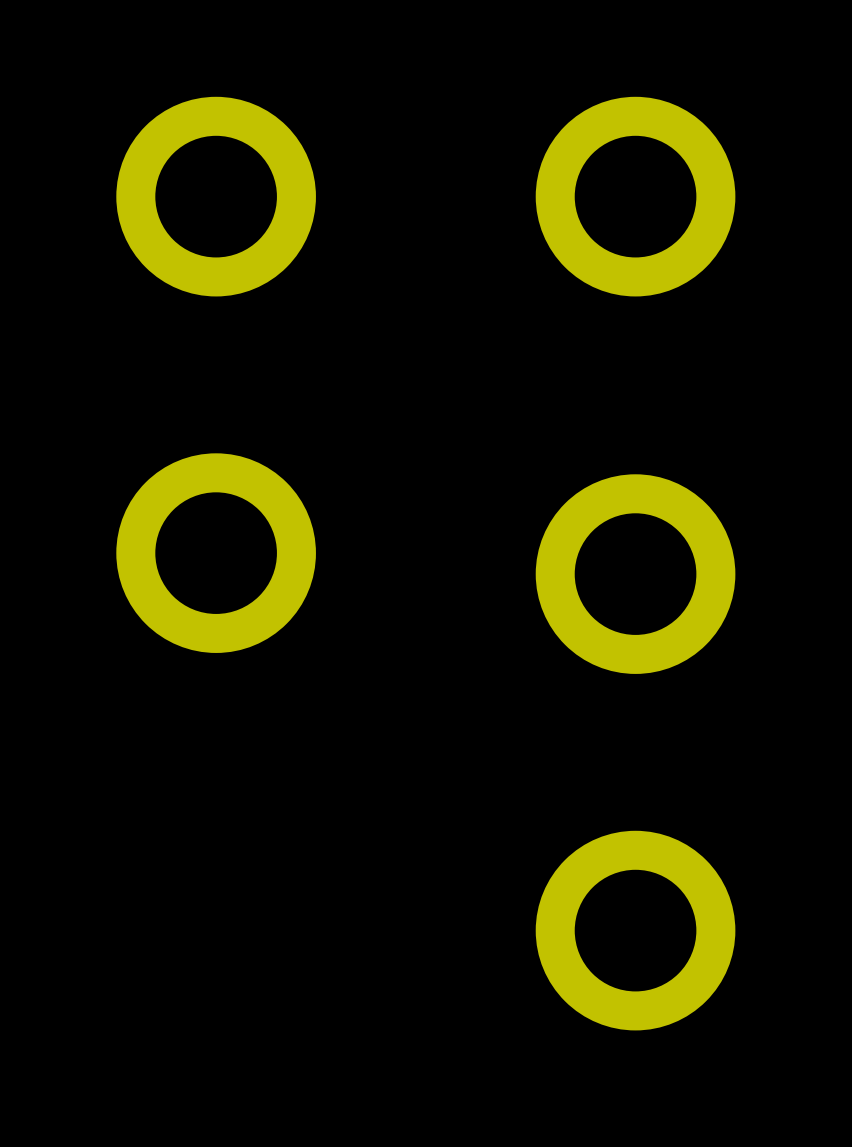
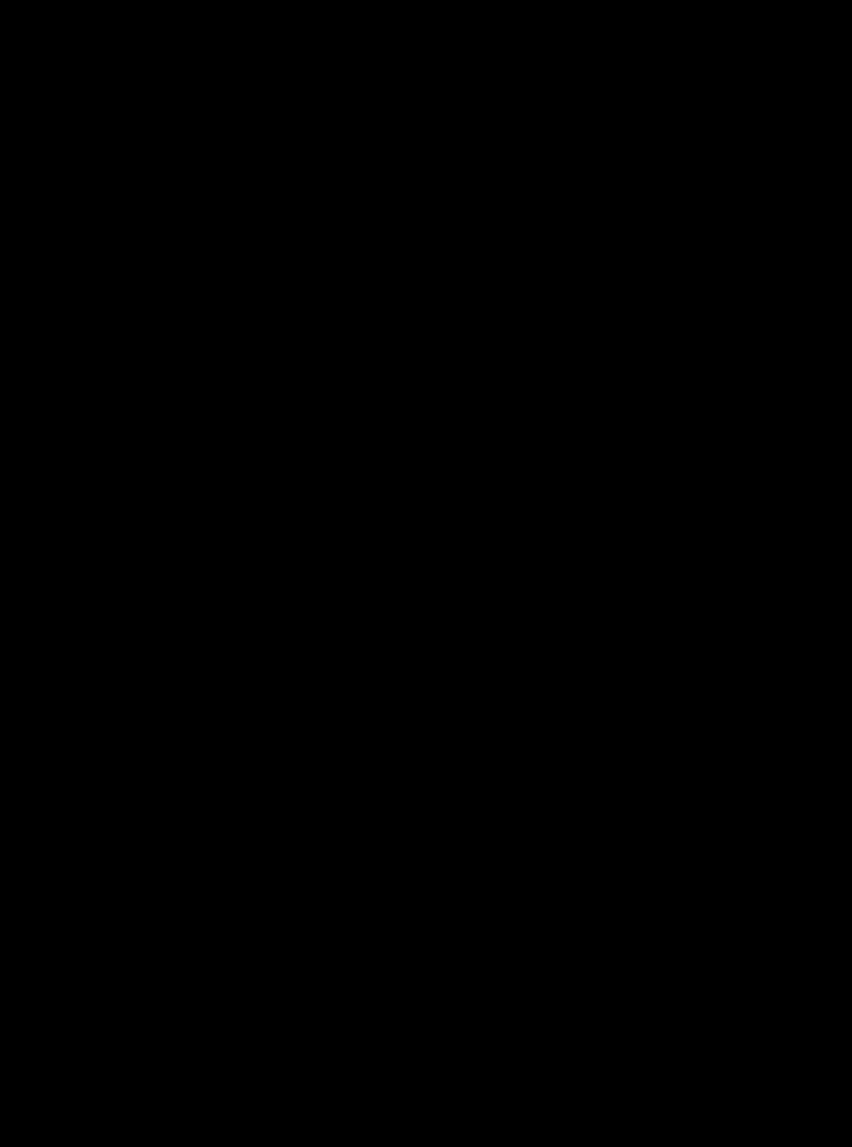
part: (216, 196) -> none
part: (635, 196) -> none
part: (216, 553) -> none
part: (635, 574) -> none
part: (635, 930) -> none

